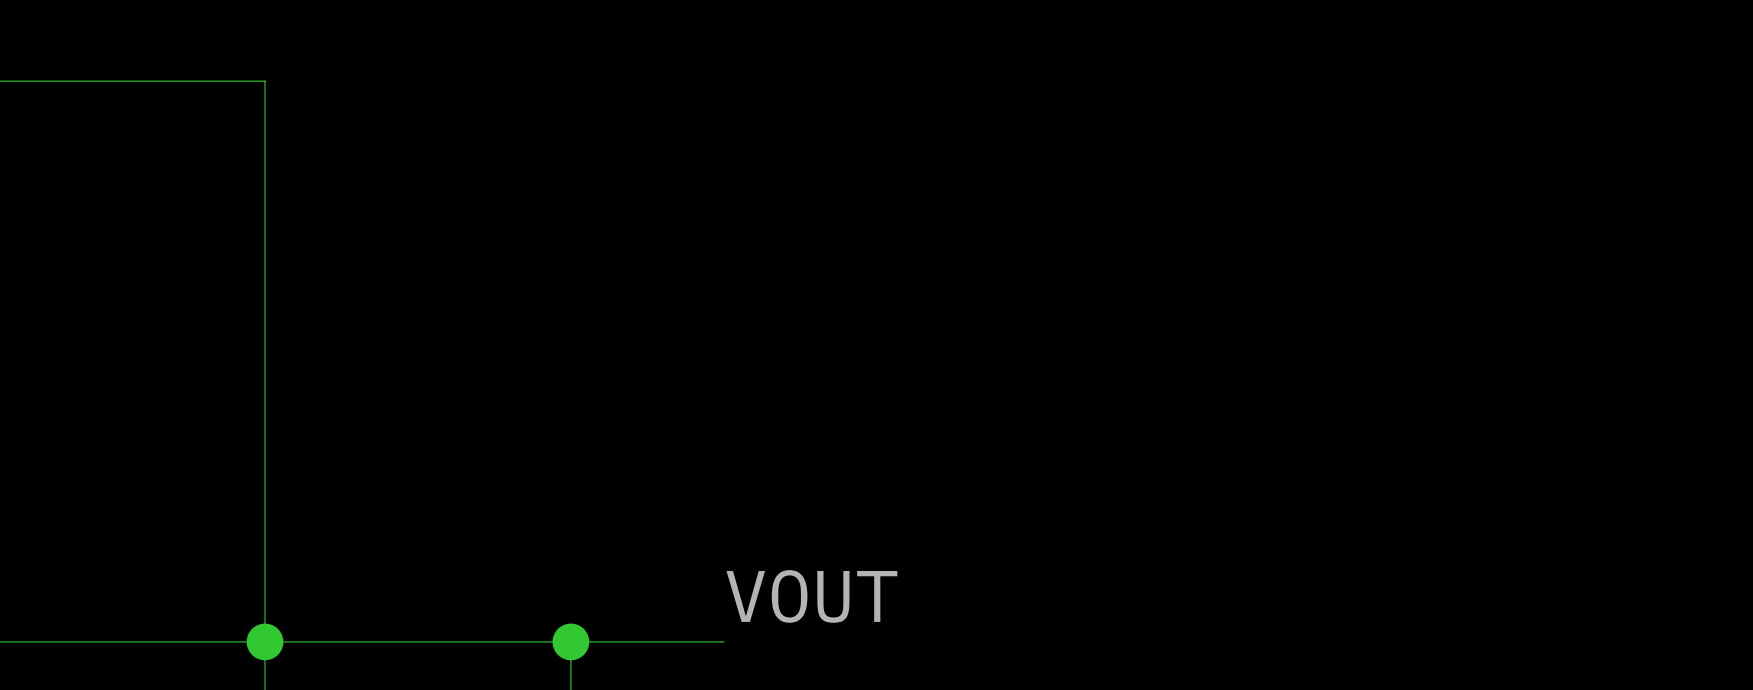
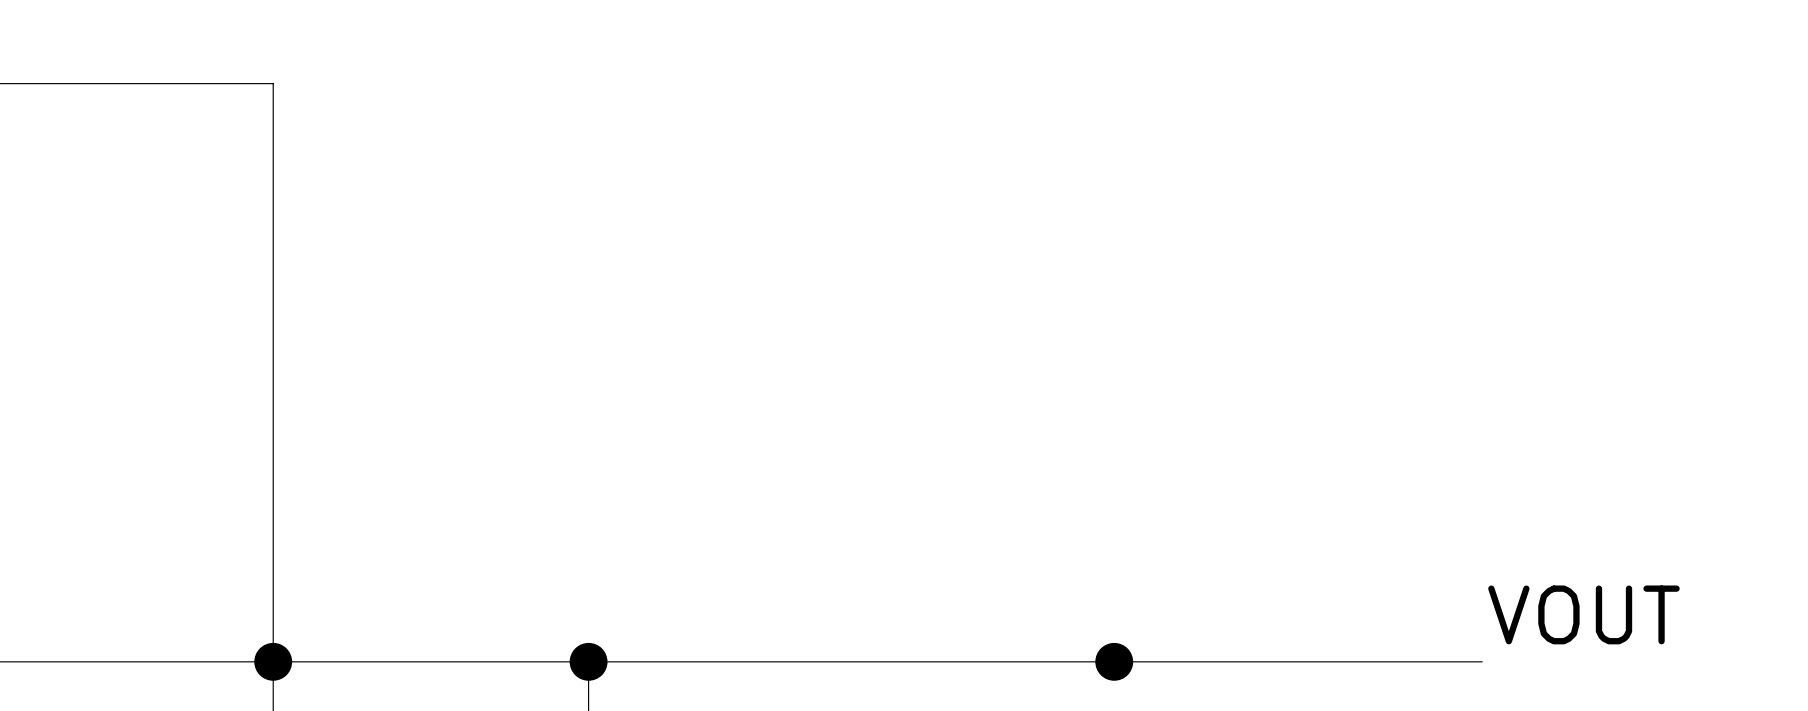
label position: VOUT (811, 596) -> VOUT (1583, 614)
wire: none -> (746, 661) (1482, 661)
junction: none -> (1114, 661)

